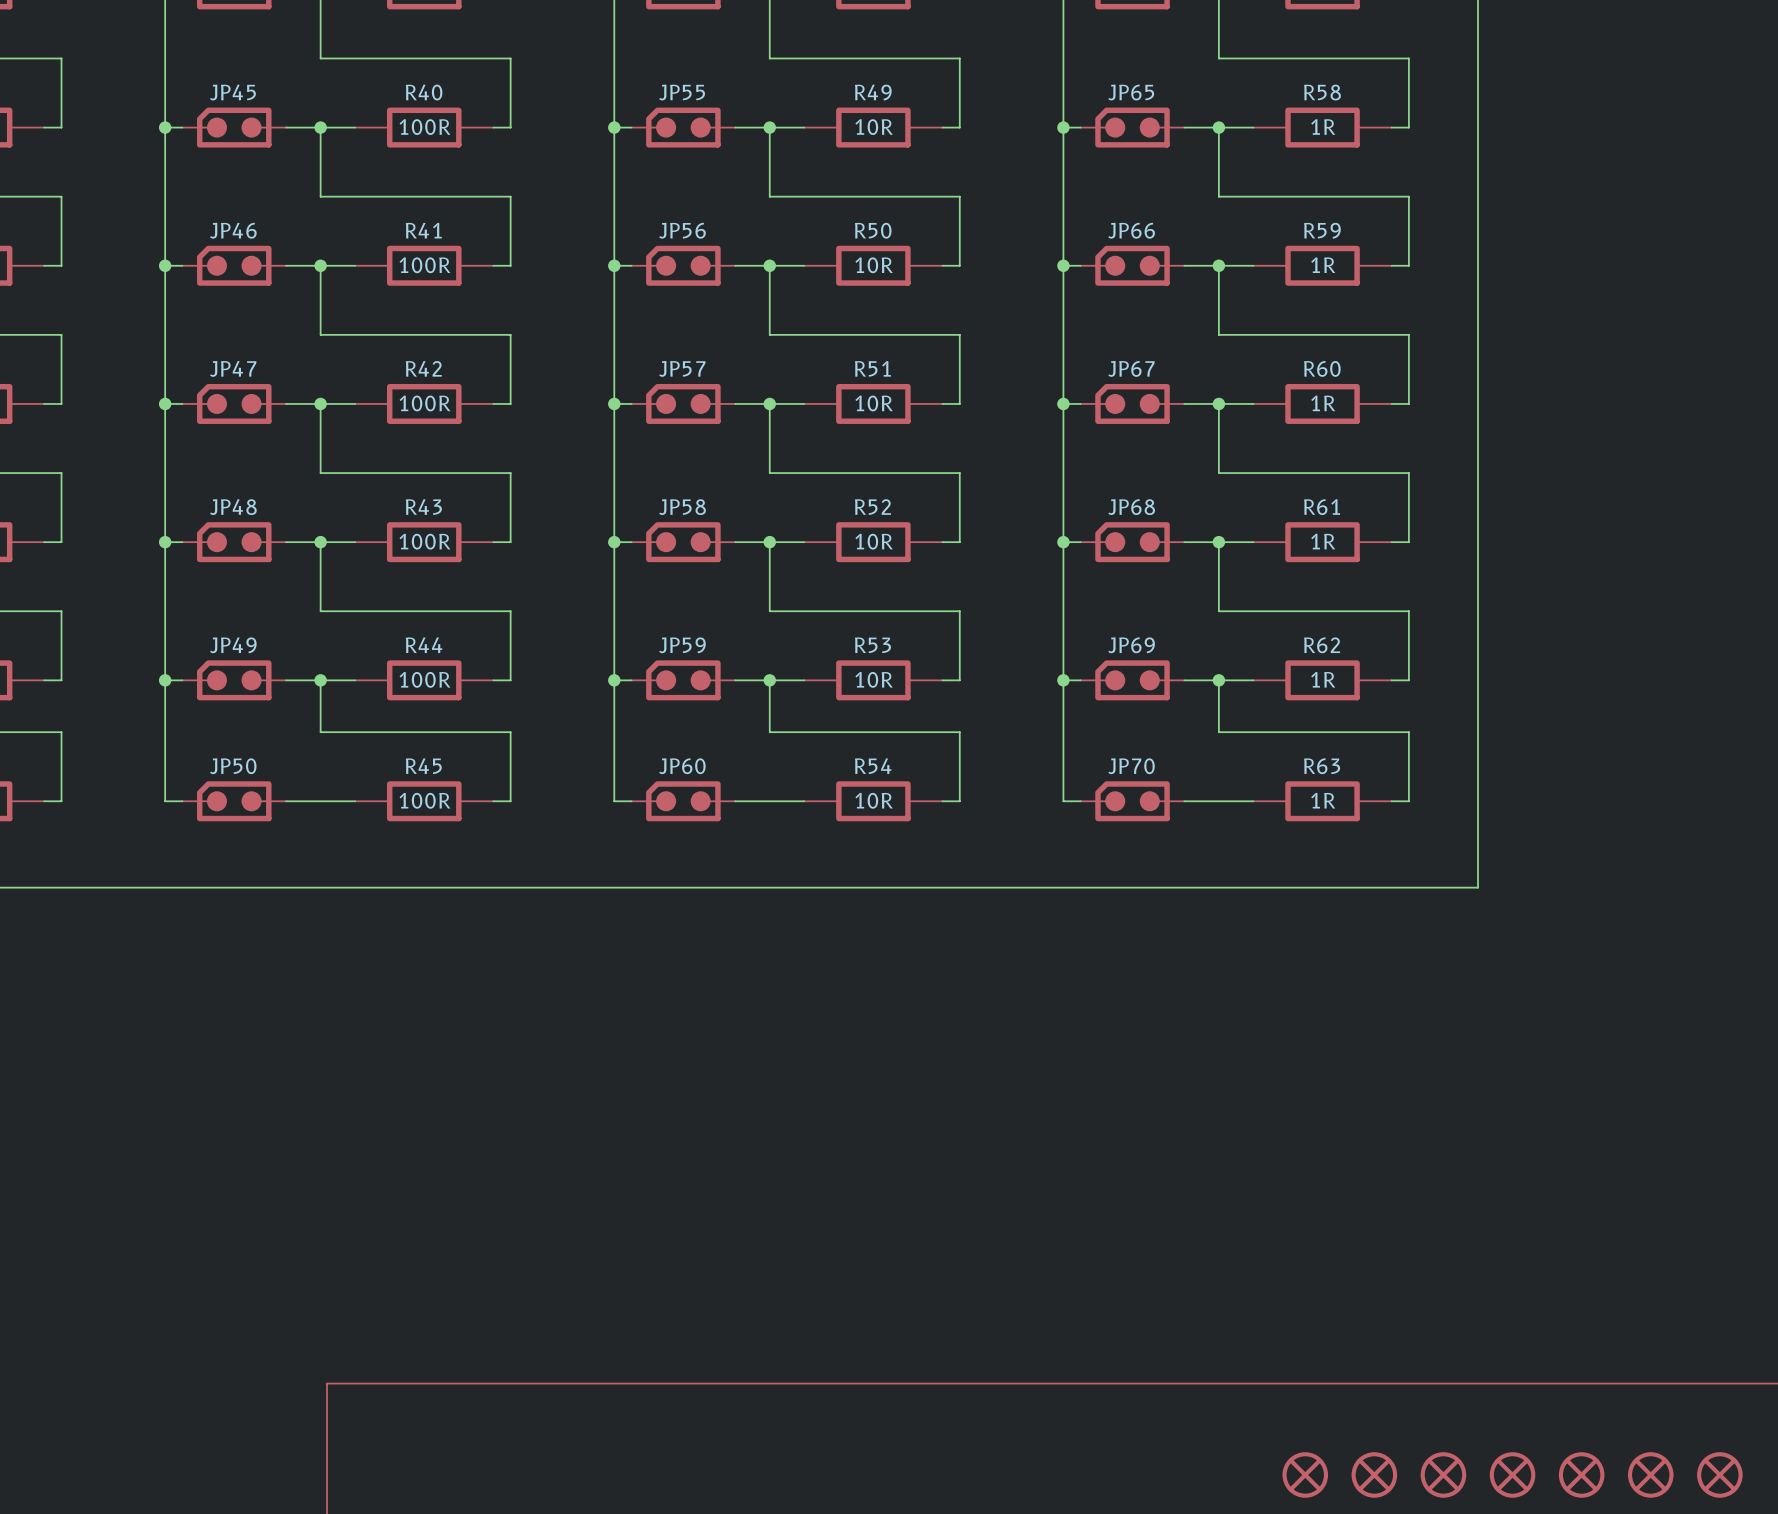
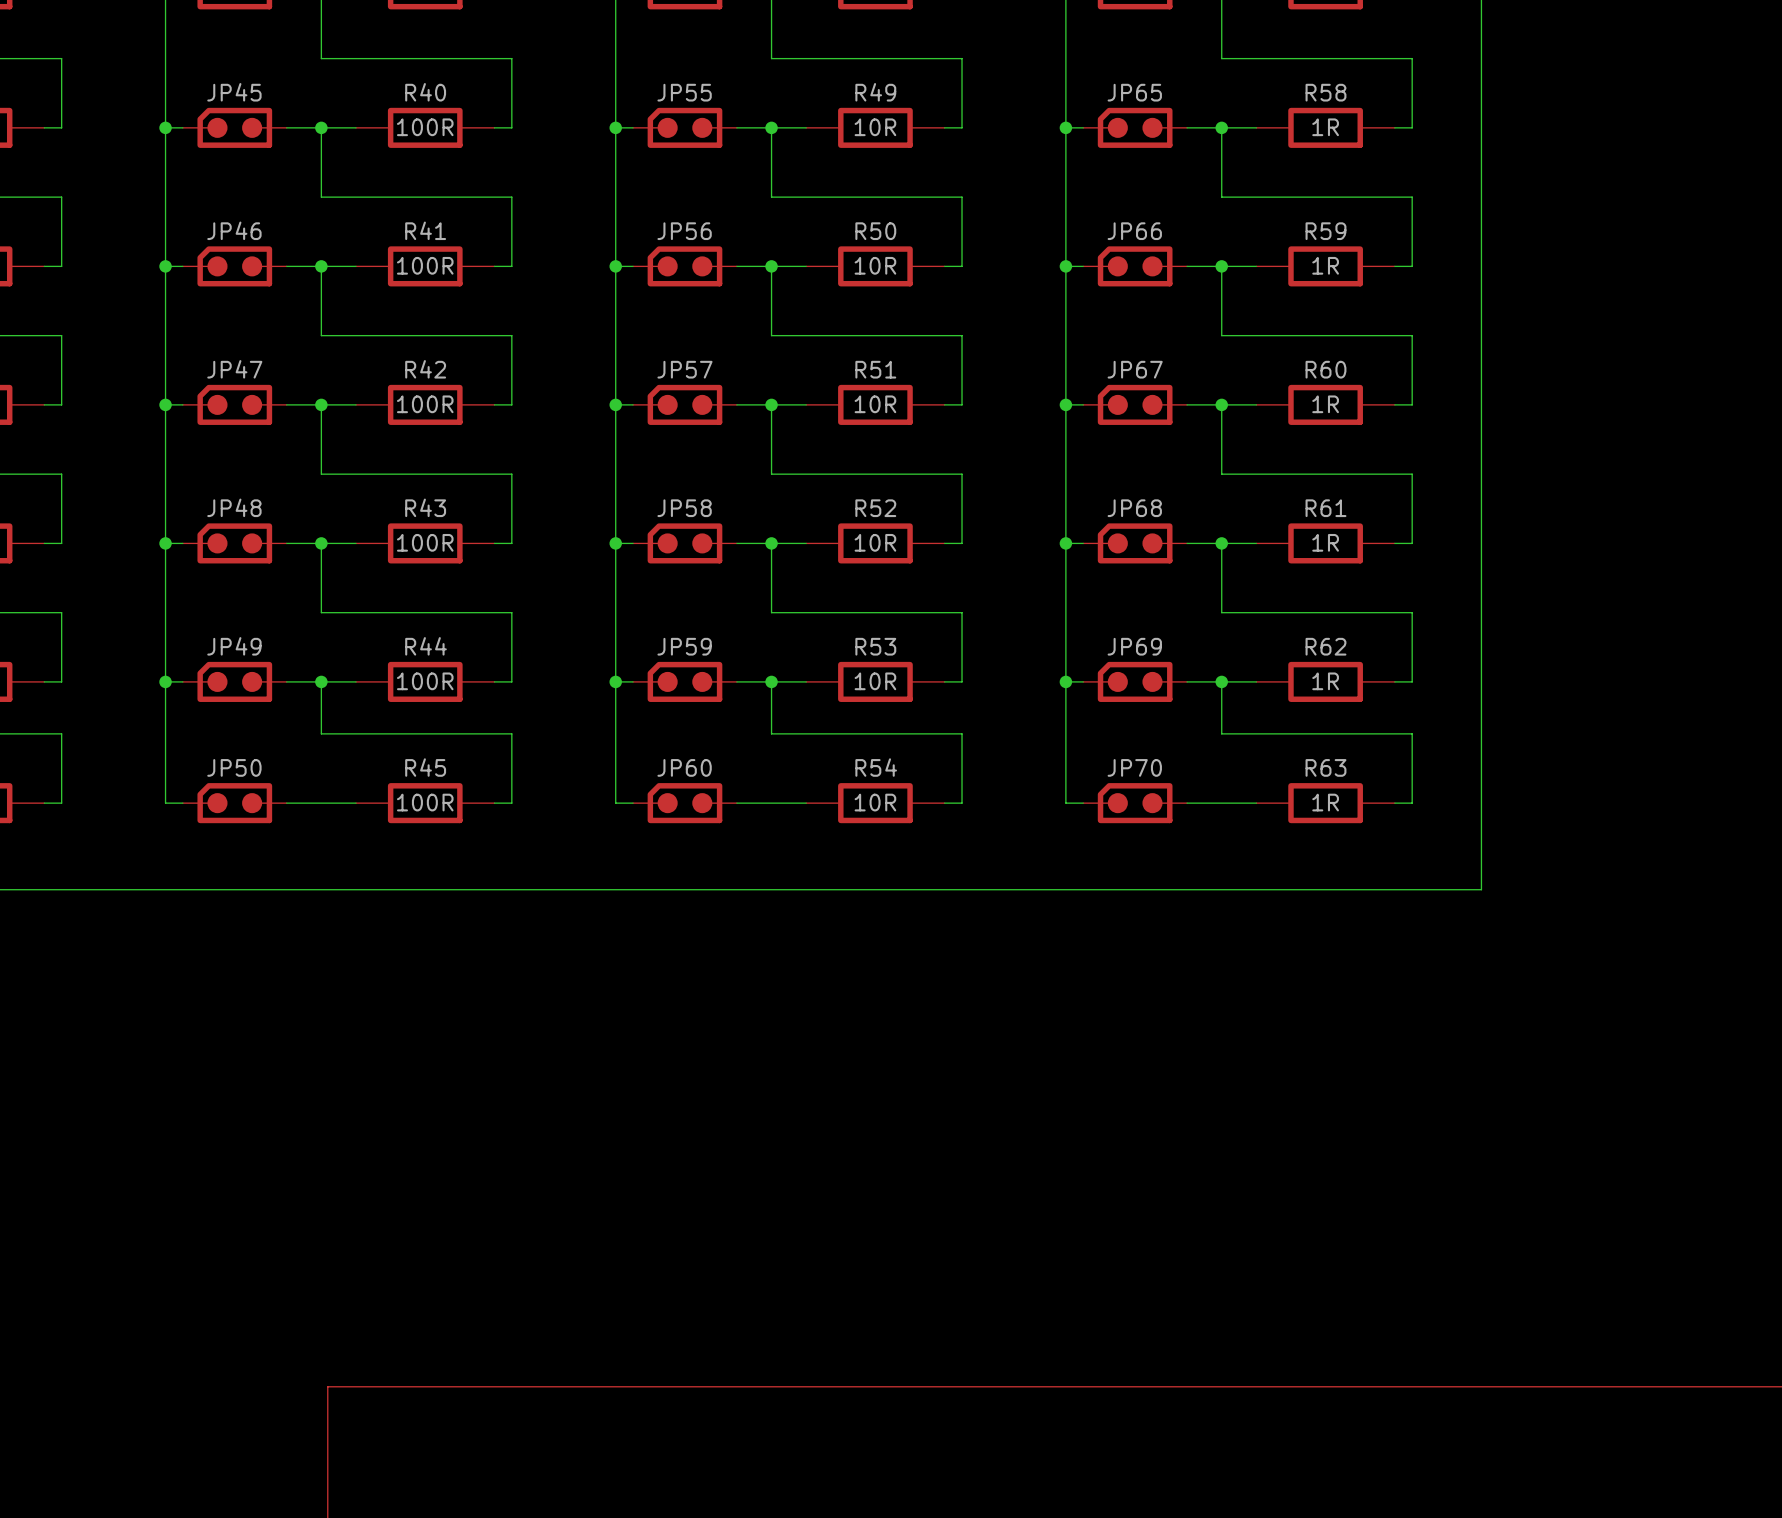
part: (1305, 1474) -> none
part: (1374, 1474) -> none
part: (1443, 1474) -> none
part: (1512, 1474) -> none
part: (1581, 1474) -> none
part: (1650, 1474) -> none
part: (1719, 1474) -> none

